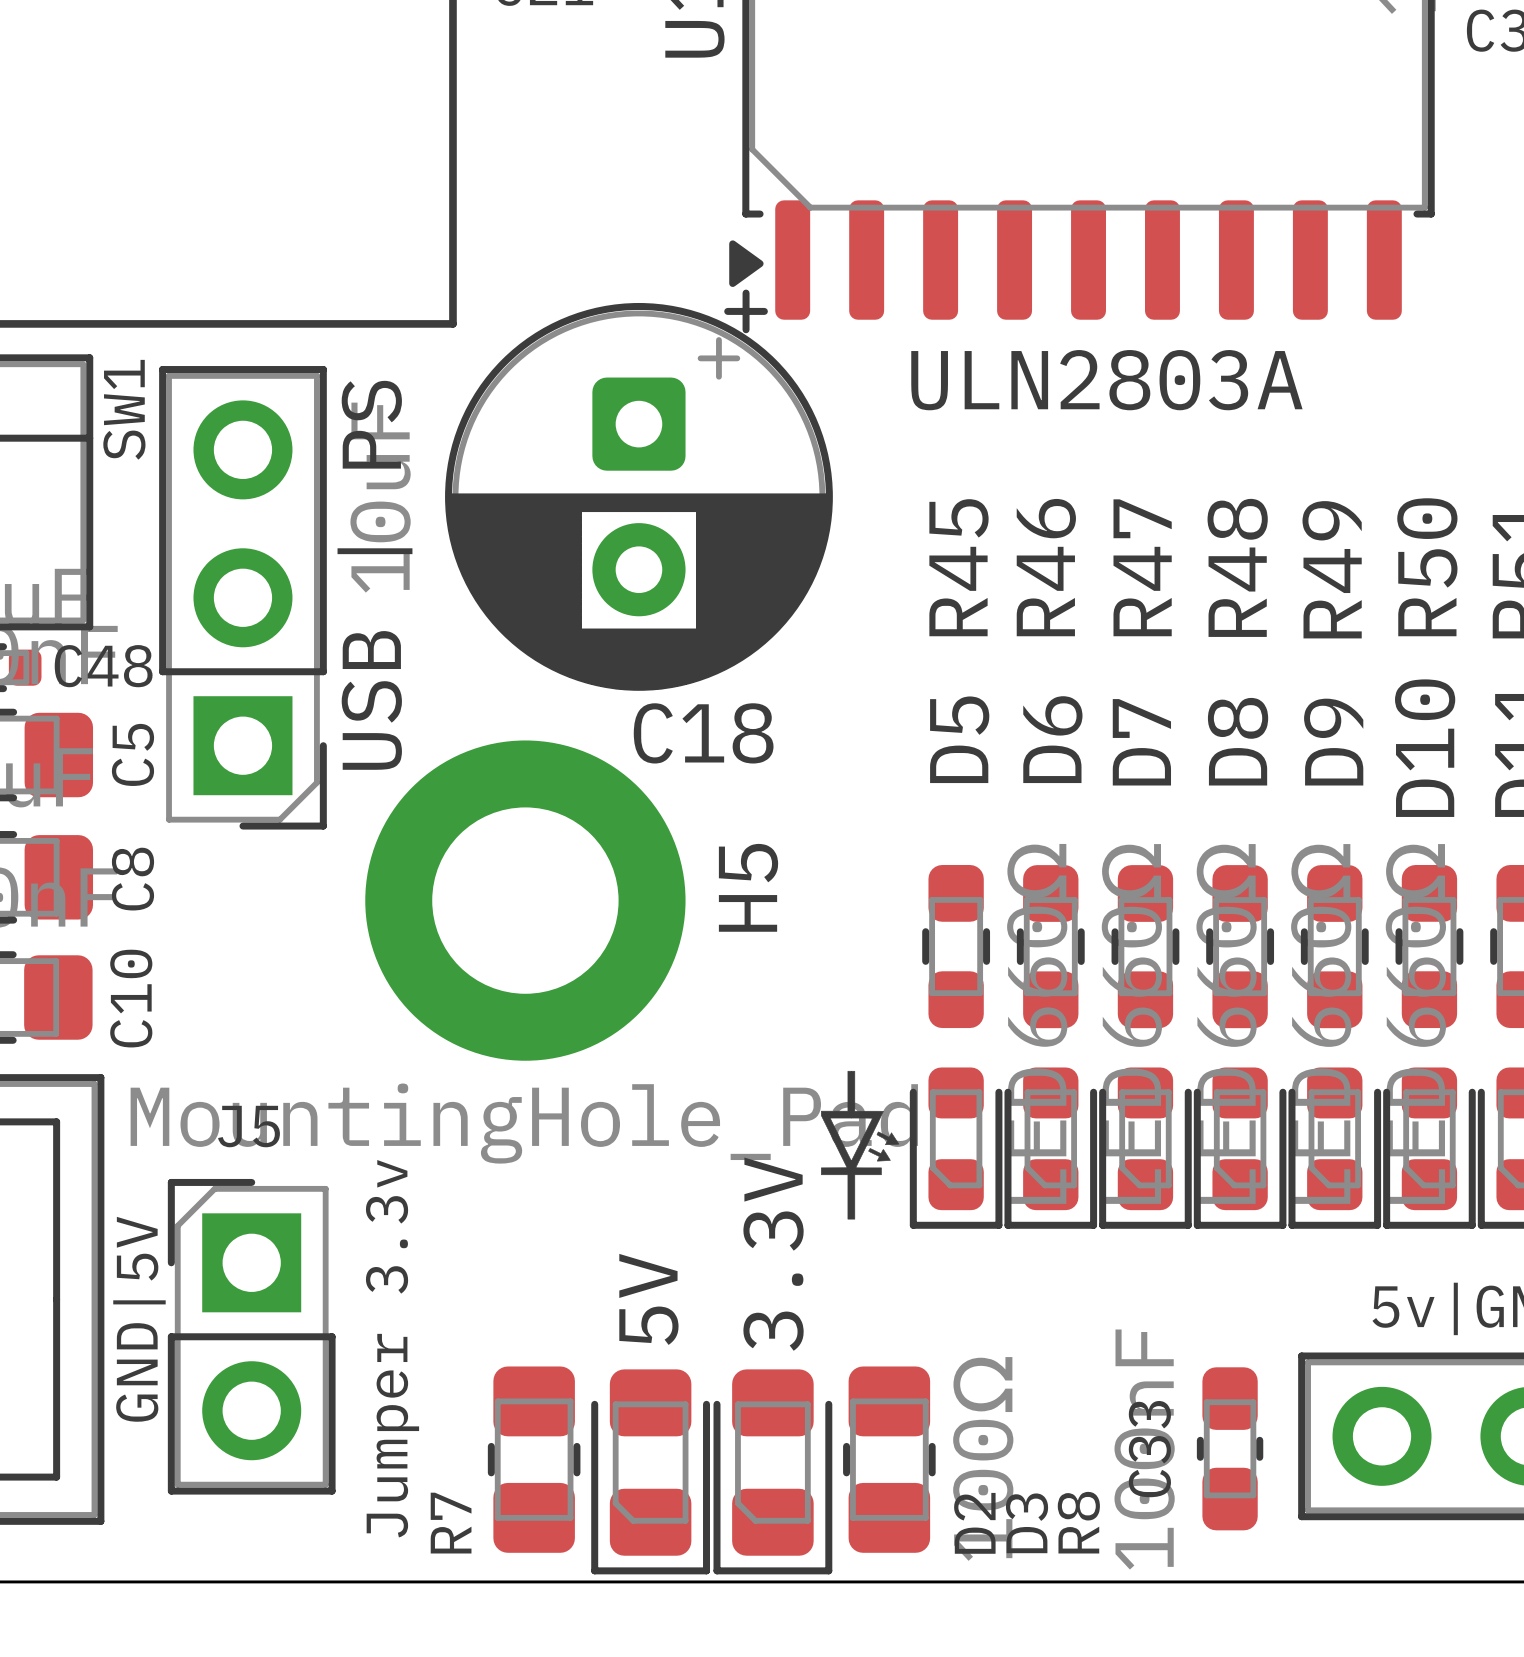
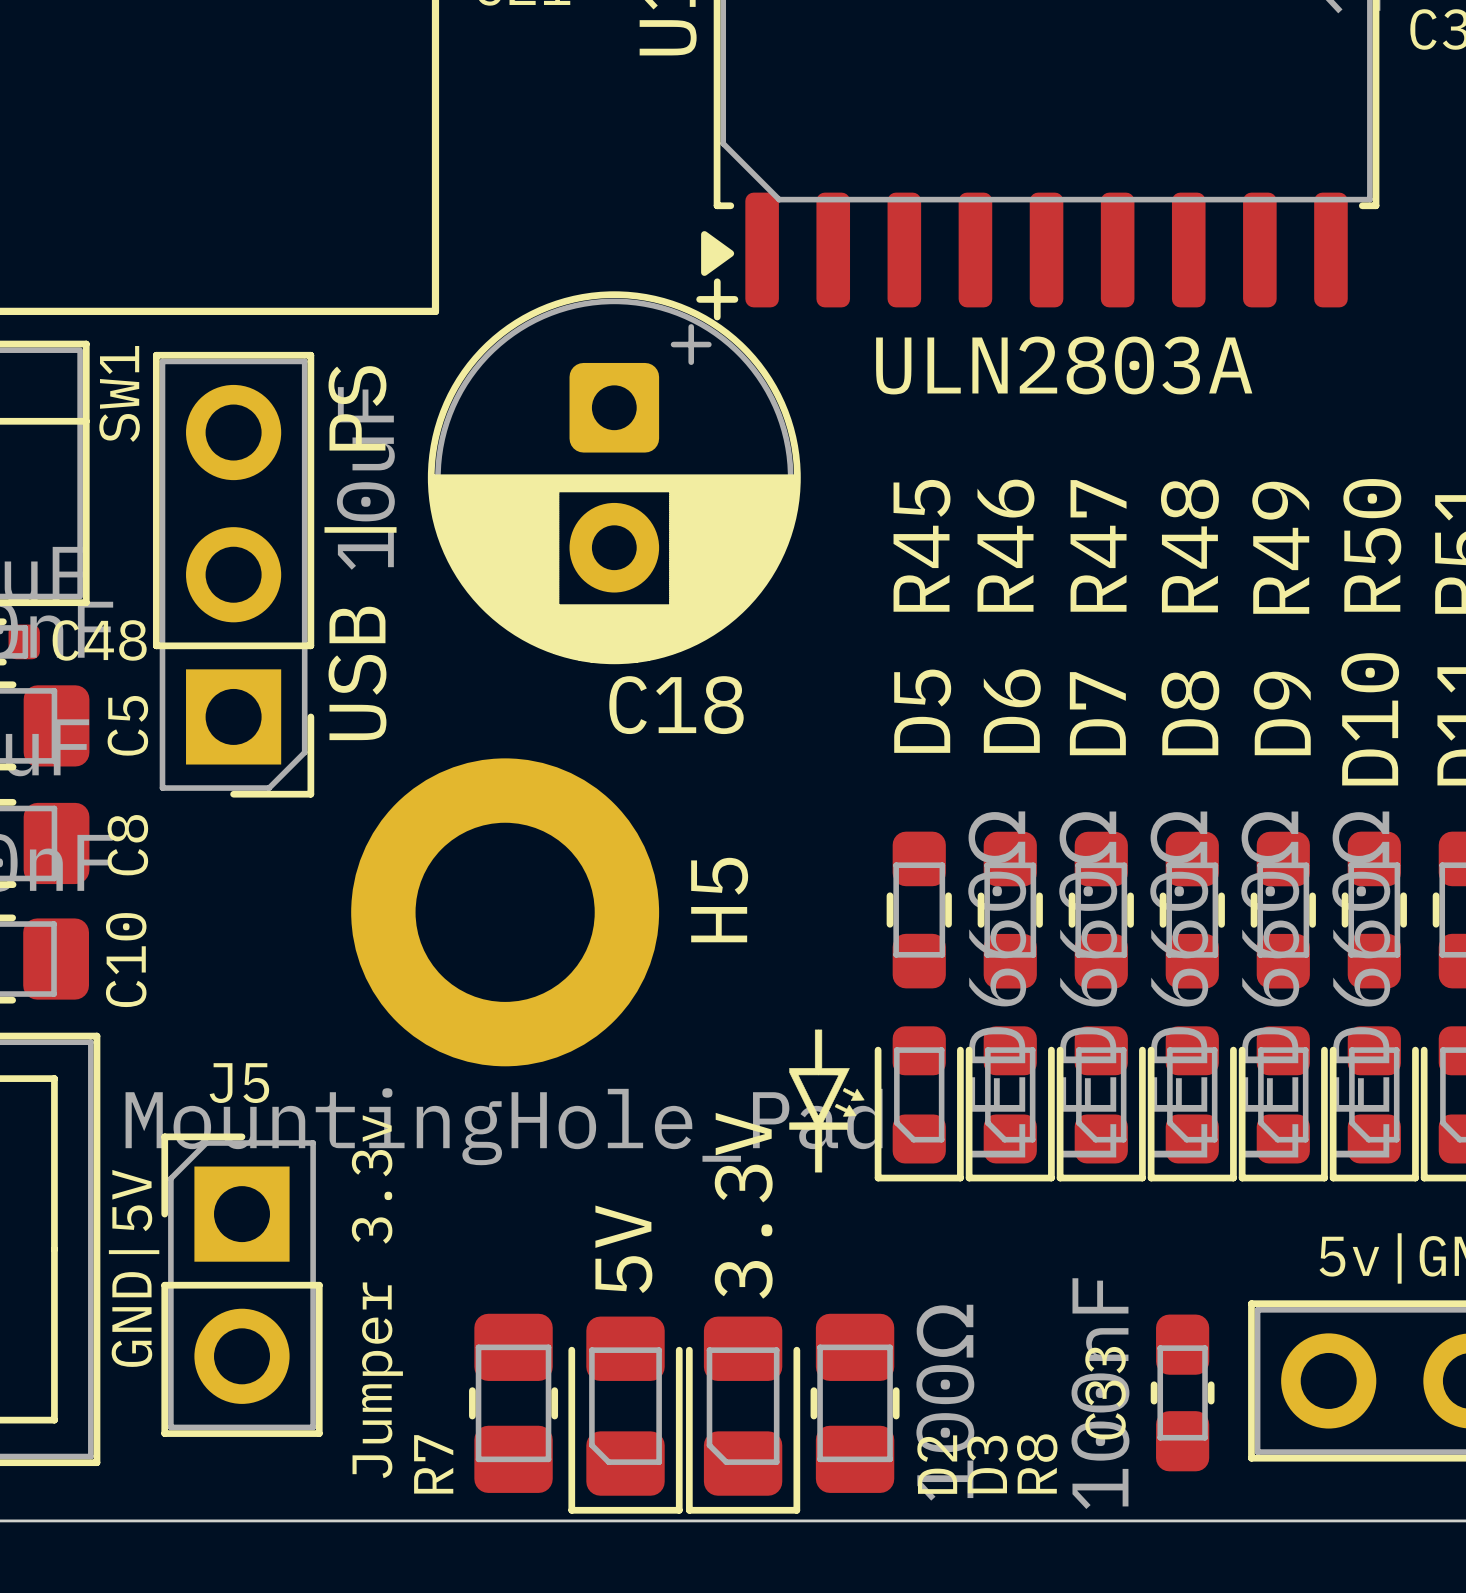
H5 position: (525, 900) -> (505, 912)

